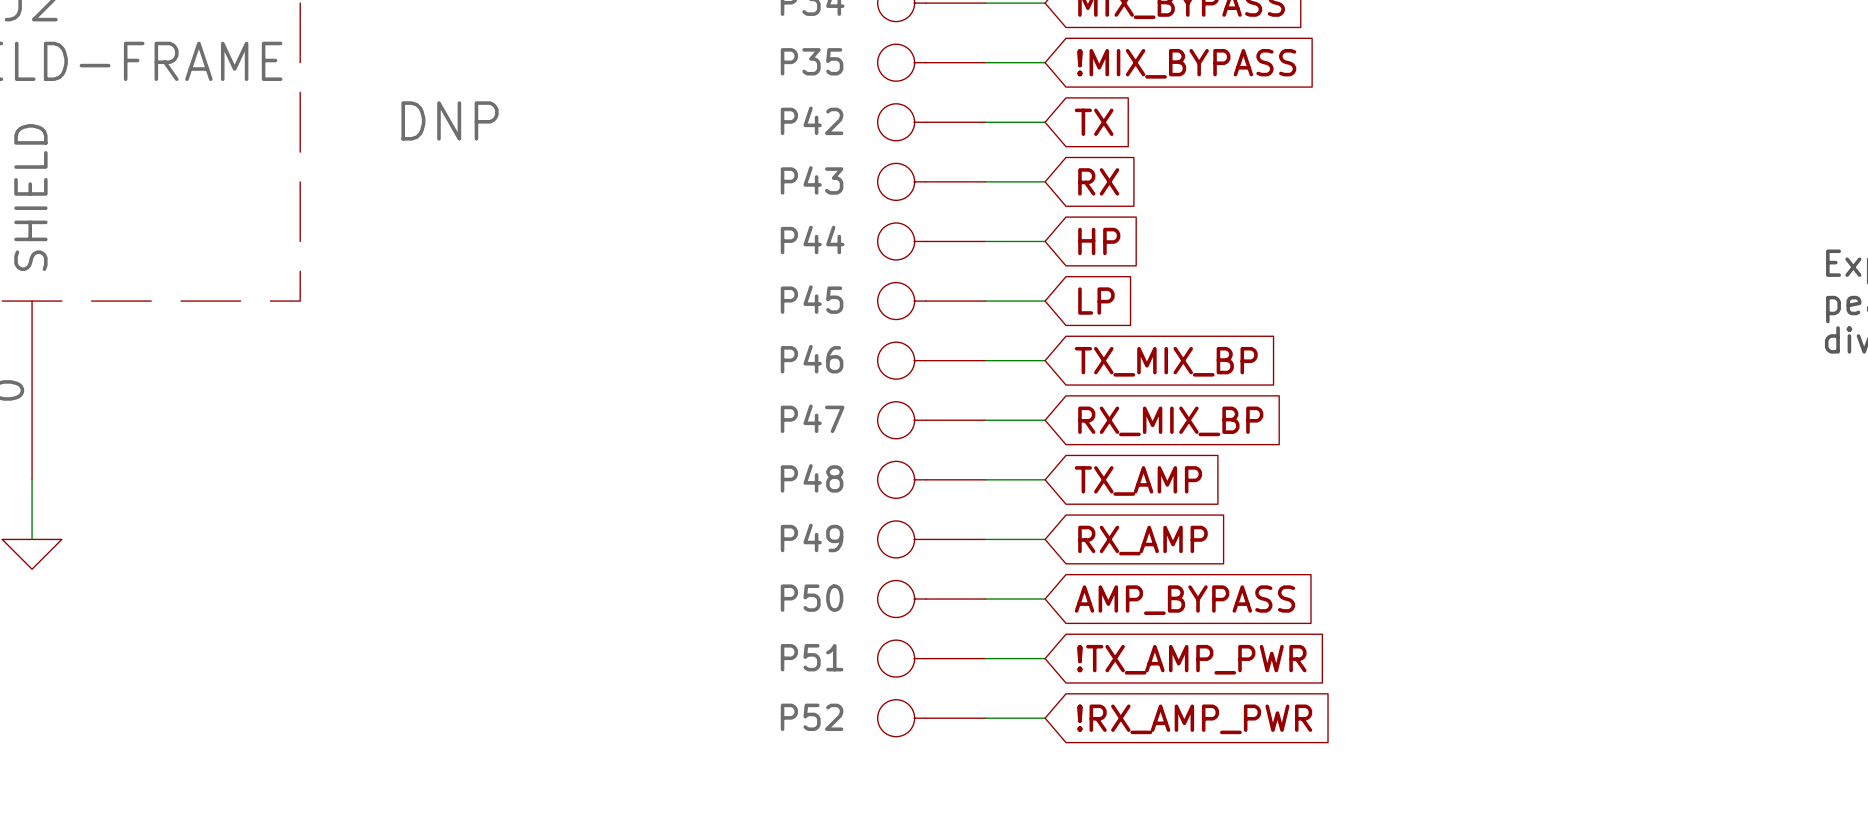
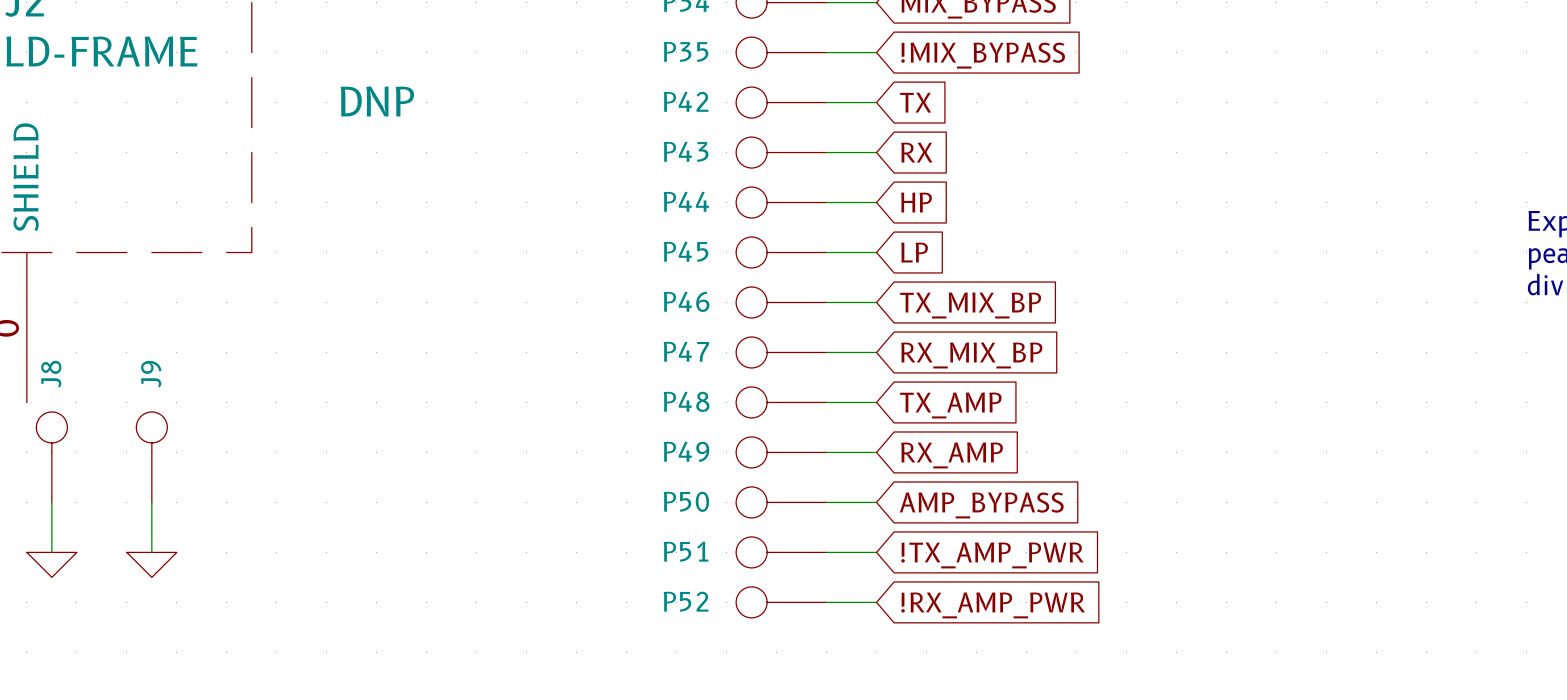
wire: (32, 479) (32, 539) -> (51, 502) (51, 552)
J8: none -> (51, 457)
J9: none -> (151, 457)
power symbol: (32, 554) -> none
wire: none -> (151, 502) (151, 552)
power symbol: none -> (51, 564)
power symbol: none -> (151, 564)

